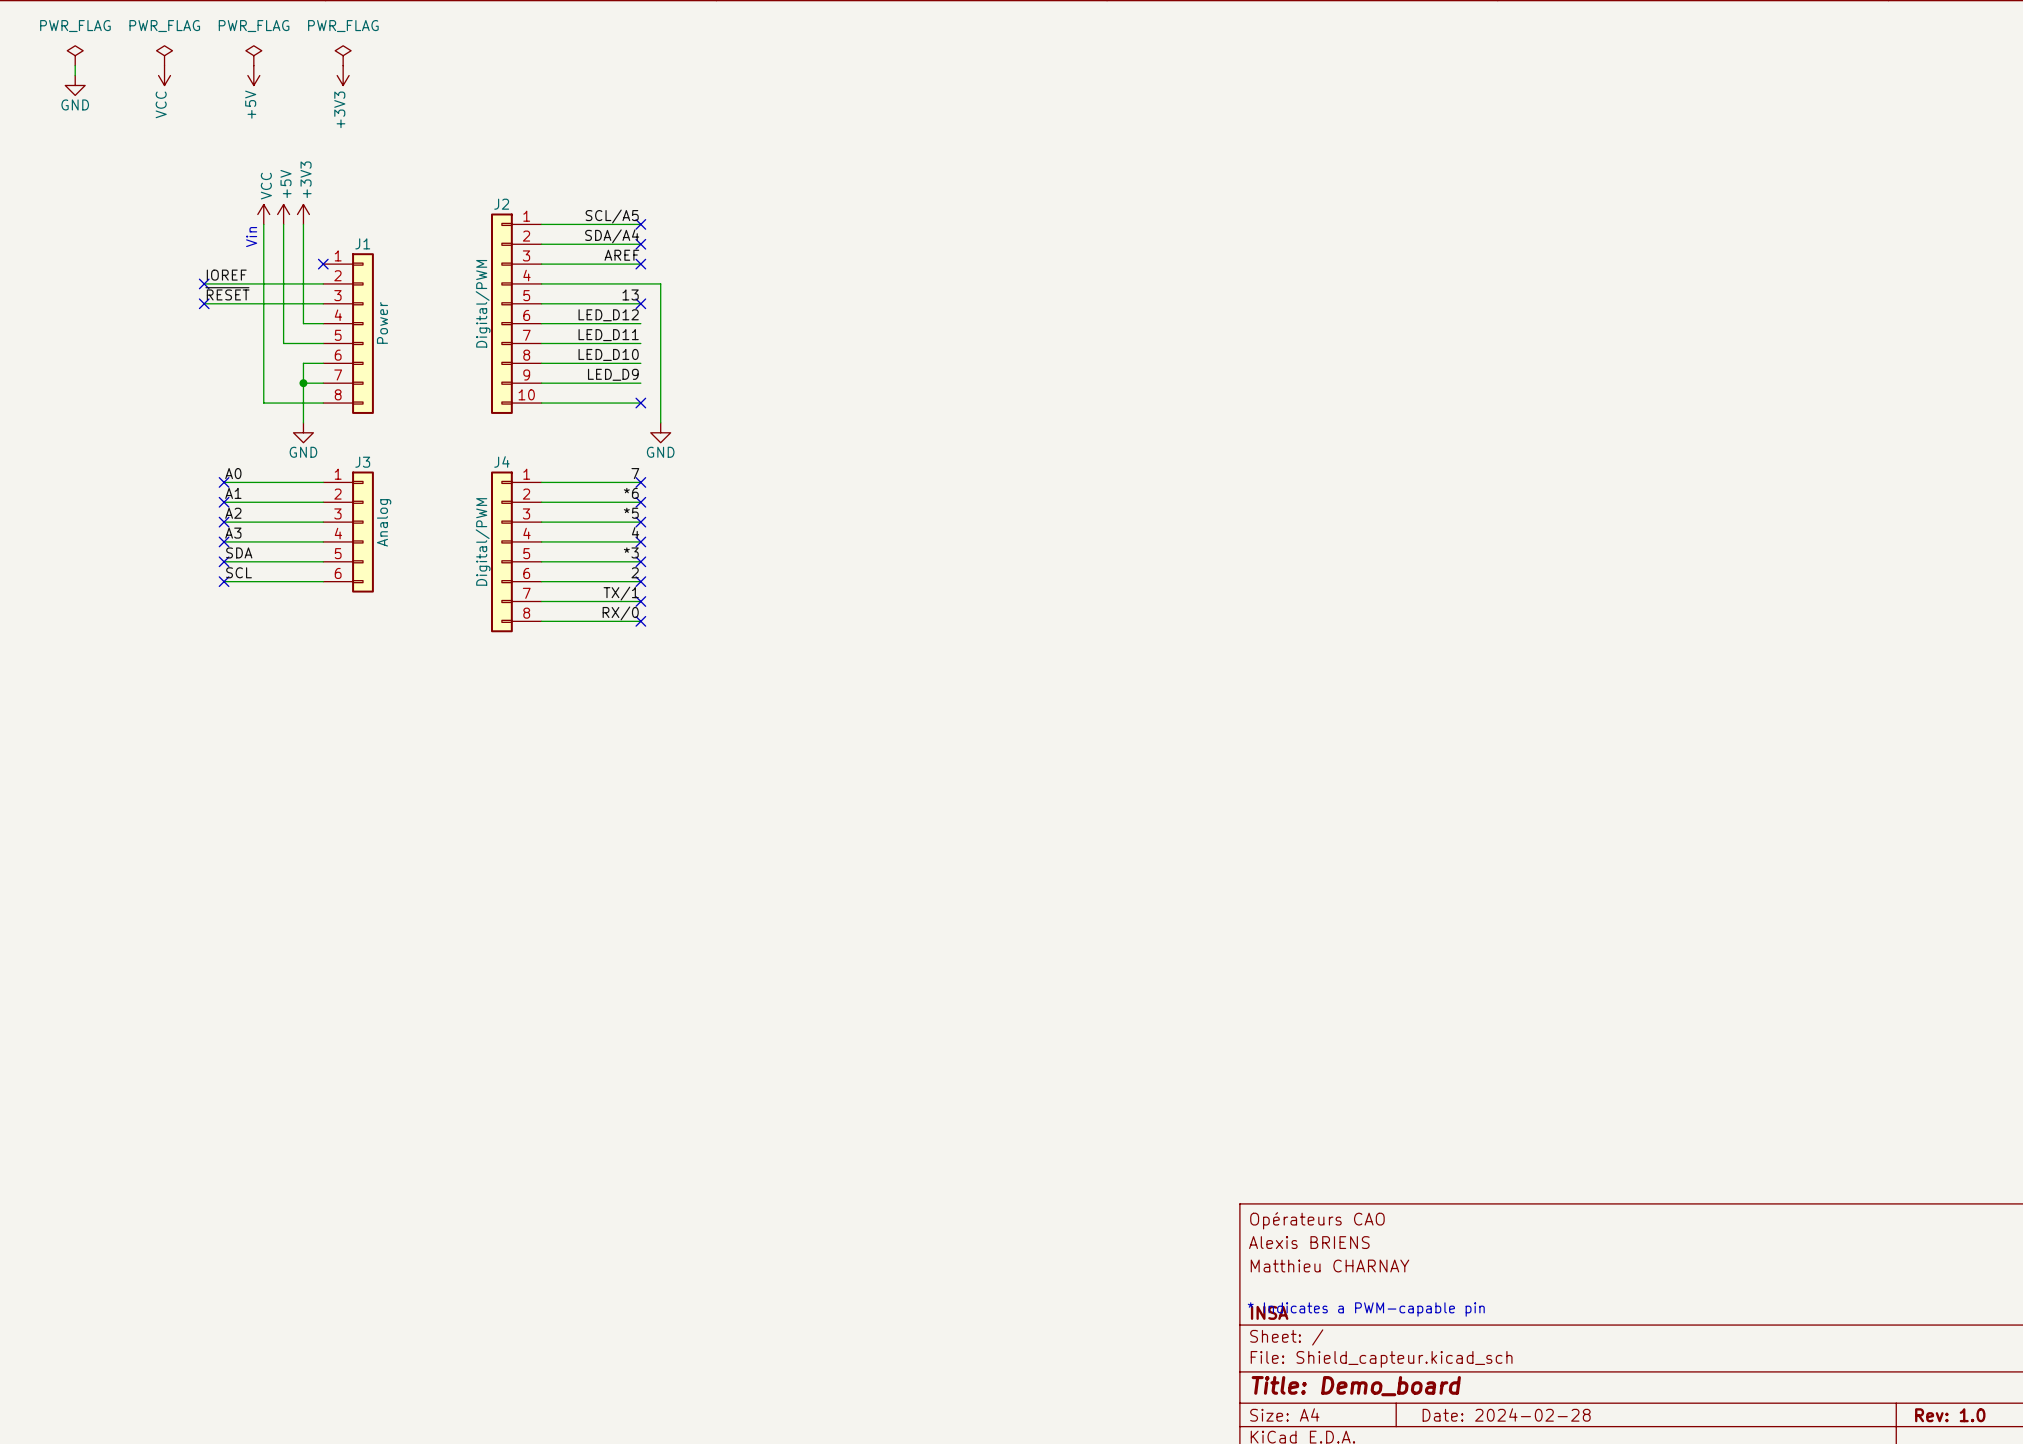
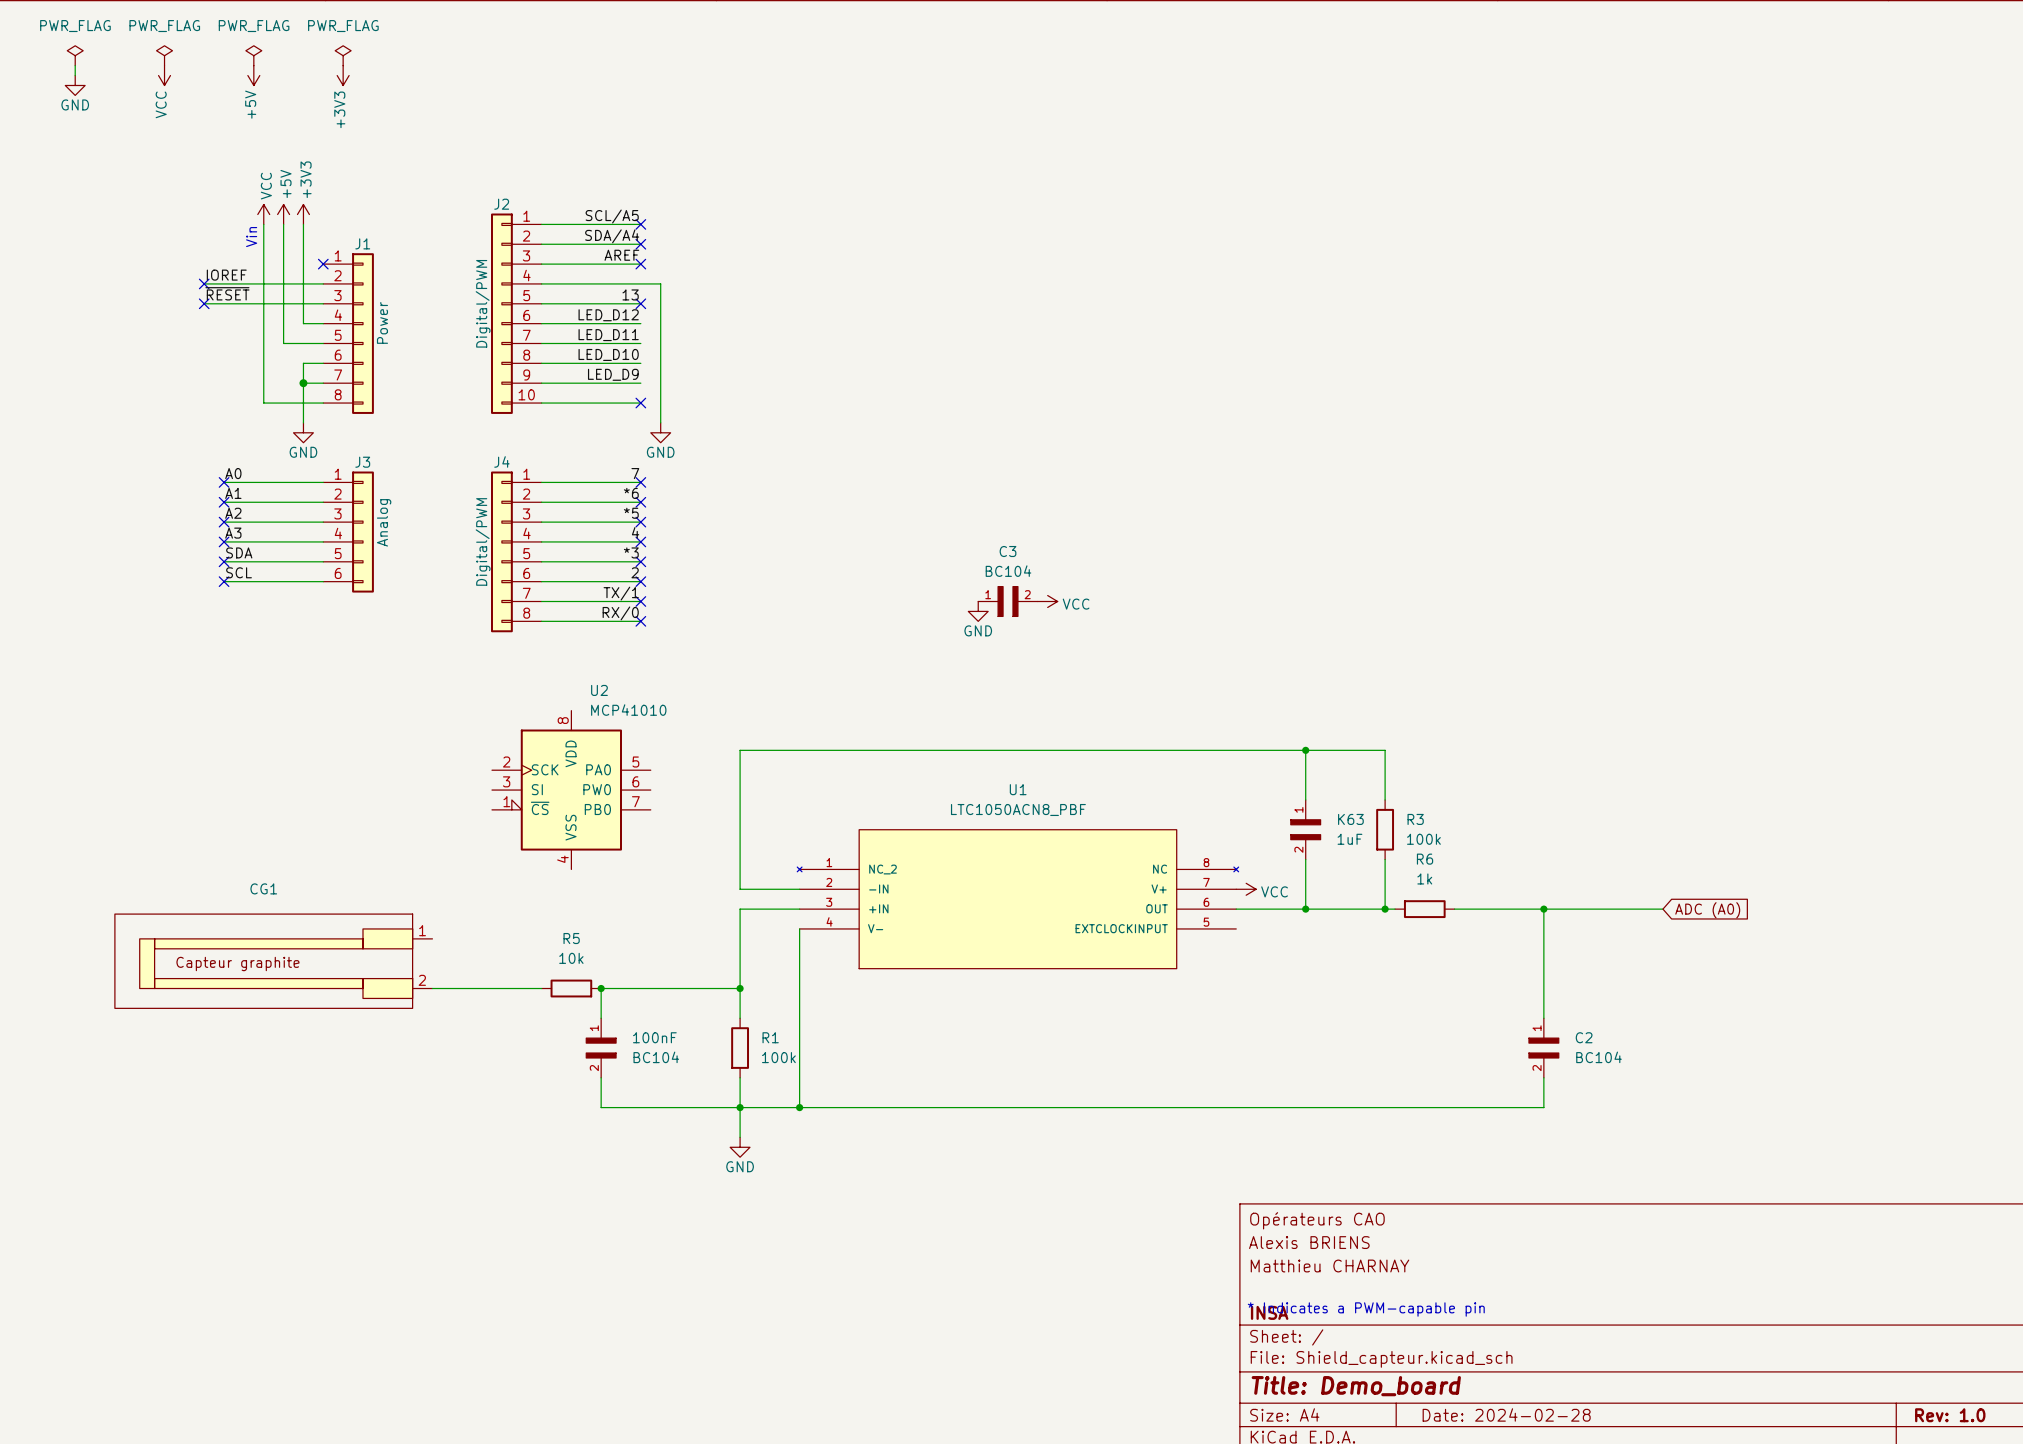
C3: none -> BC104 (1008, 601)
power symbol: none -> VCC (1047, 601)
power symbol: none -> GND (978, 611)
wire: none -> (1305, 750) (1305, 799)
junction: none -> (1305, 750)
U2: none -> MCP41010 (571, 790)
wire: none -> (1385, 799) (1385, 750) (740, 750) (740, 889) (799, 889)
K63: none -> 1uF (1305, 829)
R3: none -> 100k (1385, 829)
wire: none -> (1305, 859) (1305, 909)
wire: none -> (1385, 859) (1385, 909)
power symbol: none -> VCC (1246, 889)
U1: none -> LTC1050ACN8_PBF (1017, 899)
wire: none -> (799, 909) (740, 909) (740, 1018)
wire: none -> (1236, 909) (1395, 909)
junction: none -> (1305, 909)
junction: none -> (1385, 909)
R6: none -> 1k (1424, 909)
wire: none -> (1454, 909) (1662, 909)
wire: none -> (1543, 909) (1543, 1018)
junction: none -> (1543, 909)
global label: none -> ADC (A0) (1707, 910)
wire: none -> (799, 928) (799, 1107)
CG1: none -> (273, 961)
wire: none -> (432, 988) (541, 988)
R5: none -> 10k (571, 988)
junction: none -> (601, 988)
wire: none -> (740, 988) (601, 988) (601, 1018)
junction: none -> (740, 988)
BC104: none -> 100nF (601, 1048)
R1: none -> 100k (740, 1048)
C2: none -> BC104 (1543, 1048)
wire: none -> (601, 1077) (601, 1107) (1543, 1107) (1543, 1077)
wire: none -> (740, 1077) (740, 1137)
junction: none -> (740, 1107)
junction: none -> (799, 1107)
power symbol: none -> GND (740, 1147)

